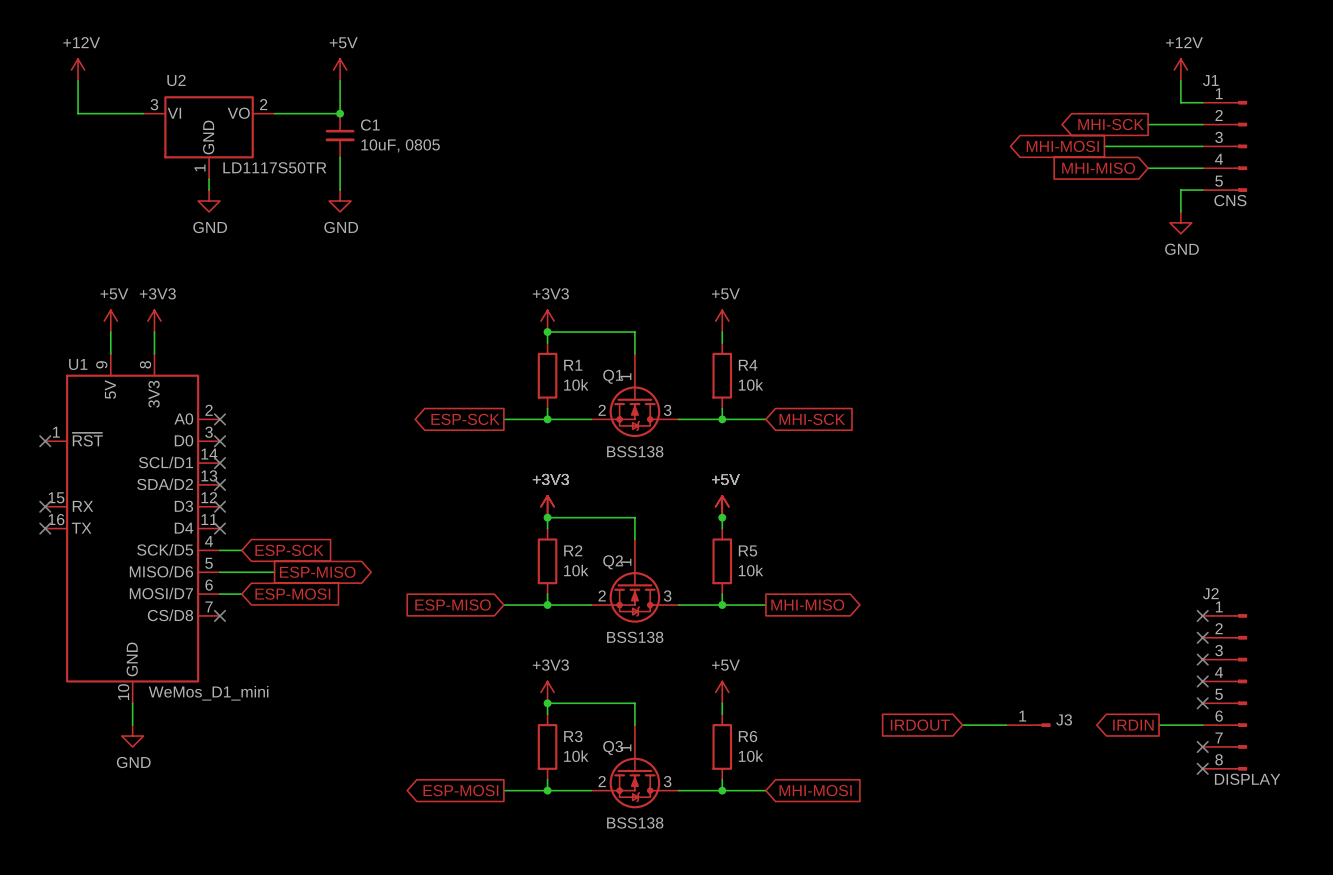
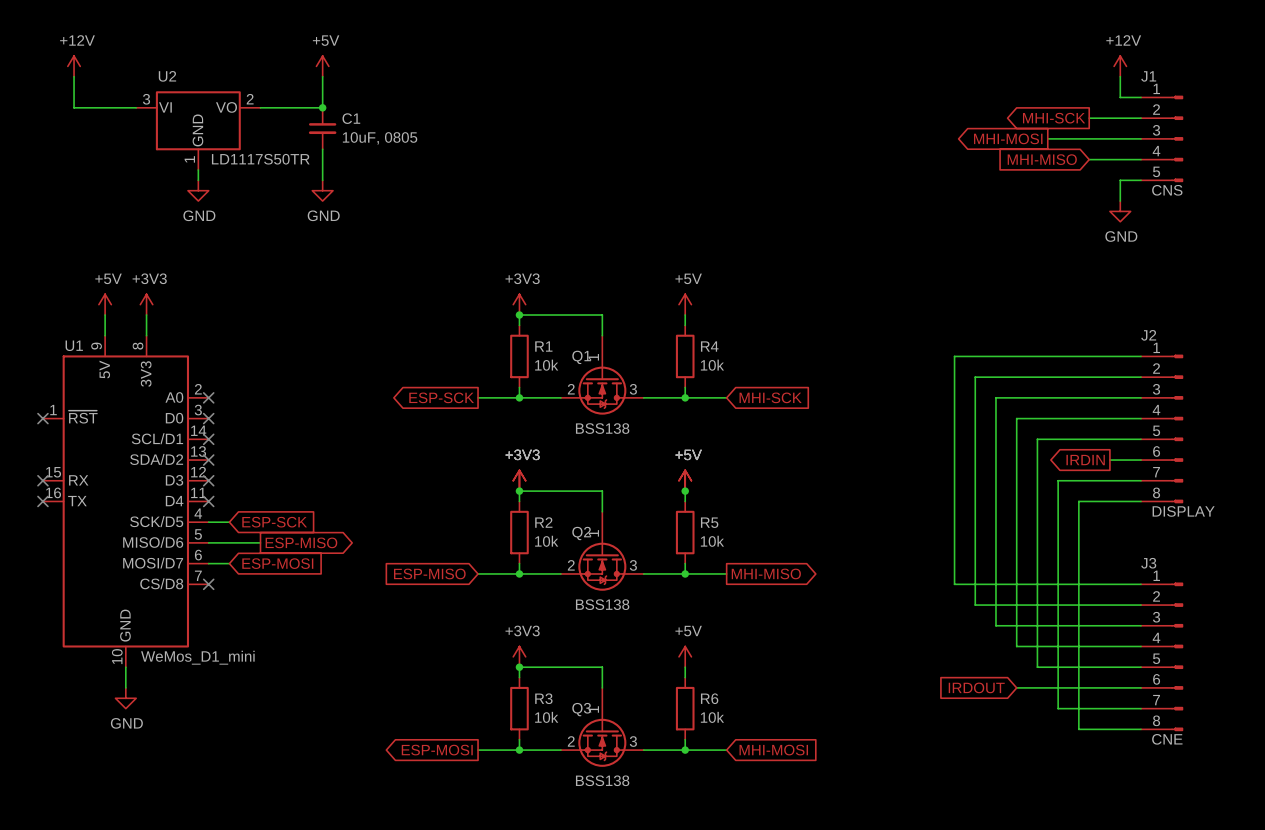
wire: none -> (1141, 356) (954, 356) (954, 584) (1141, 584)
wire: none -> (1141, 377) (975, 377) (975, 605) (1141, 605)
wire: none -> (1141, 397) (995, 397) (995, 625) (1141, 625)
wire: none -> (1141, 418) (1016, 418) (1016, 646) (1141, 646)
J2: none -> DISPLAY (1162, 428)
wire: none -> (1141, 439) (1037, 439) (1037, 667) (1141, 667)
global label: none -> IRDIN (1085, 460)
wire: none -> (1109, 460) (1141, 460)
wire: none -> (1141, 480) (1058, 480) (1058, 708) (1141, 708)
wire: none -> (1141, 501) (1078, 501) (1078, 729) (1141, 729)
J2 name: J2 (1210, 593) -> J3 (1148, 563)
no-connect mark: (1202, 615) -> none
no-connect mark: (1202, 637) -> none
no-connect mark: (1202, 659) -> none
no-connect mark: (1202, 681) -> none
no-connect mark: (1202, 703) -> none
global label position: IRDOUT (920, 725) -> IRDOUT (976, 687)
wire: (962, 725) (1006, 725) -> none
J3: (1028, 725) -> none
wire: none -> (1016, 687) (1099, 687)
global label: IRDIN (1133, 725) -> none
no-connect mark: (1202, 746) -> none
no-connect mark: (1202, 768) -> none
J2 value: DISPLAY (1247, 779) -> CNE (1167, 739)

